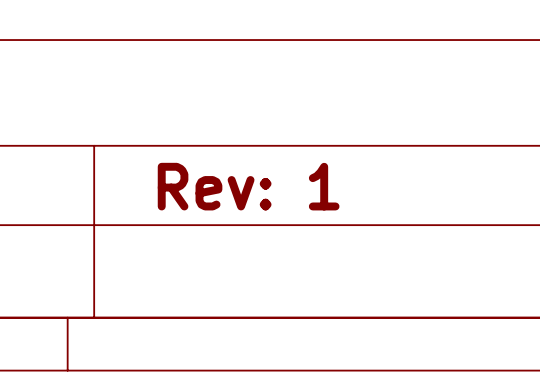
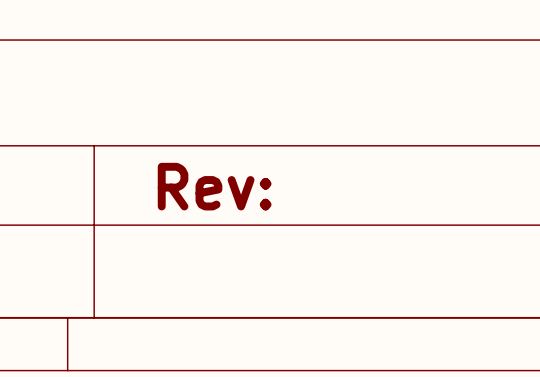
title block: Rev: 1 (248, 186) -> Rev: (214, 186)

